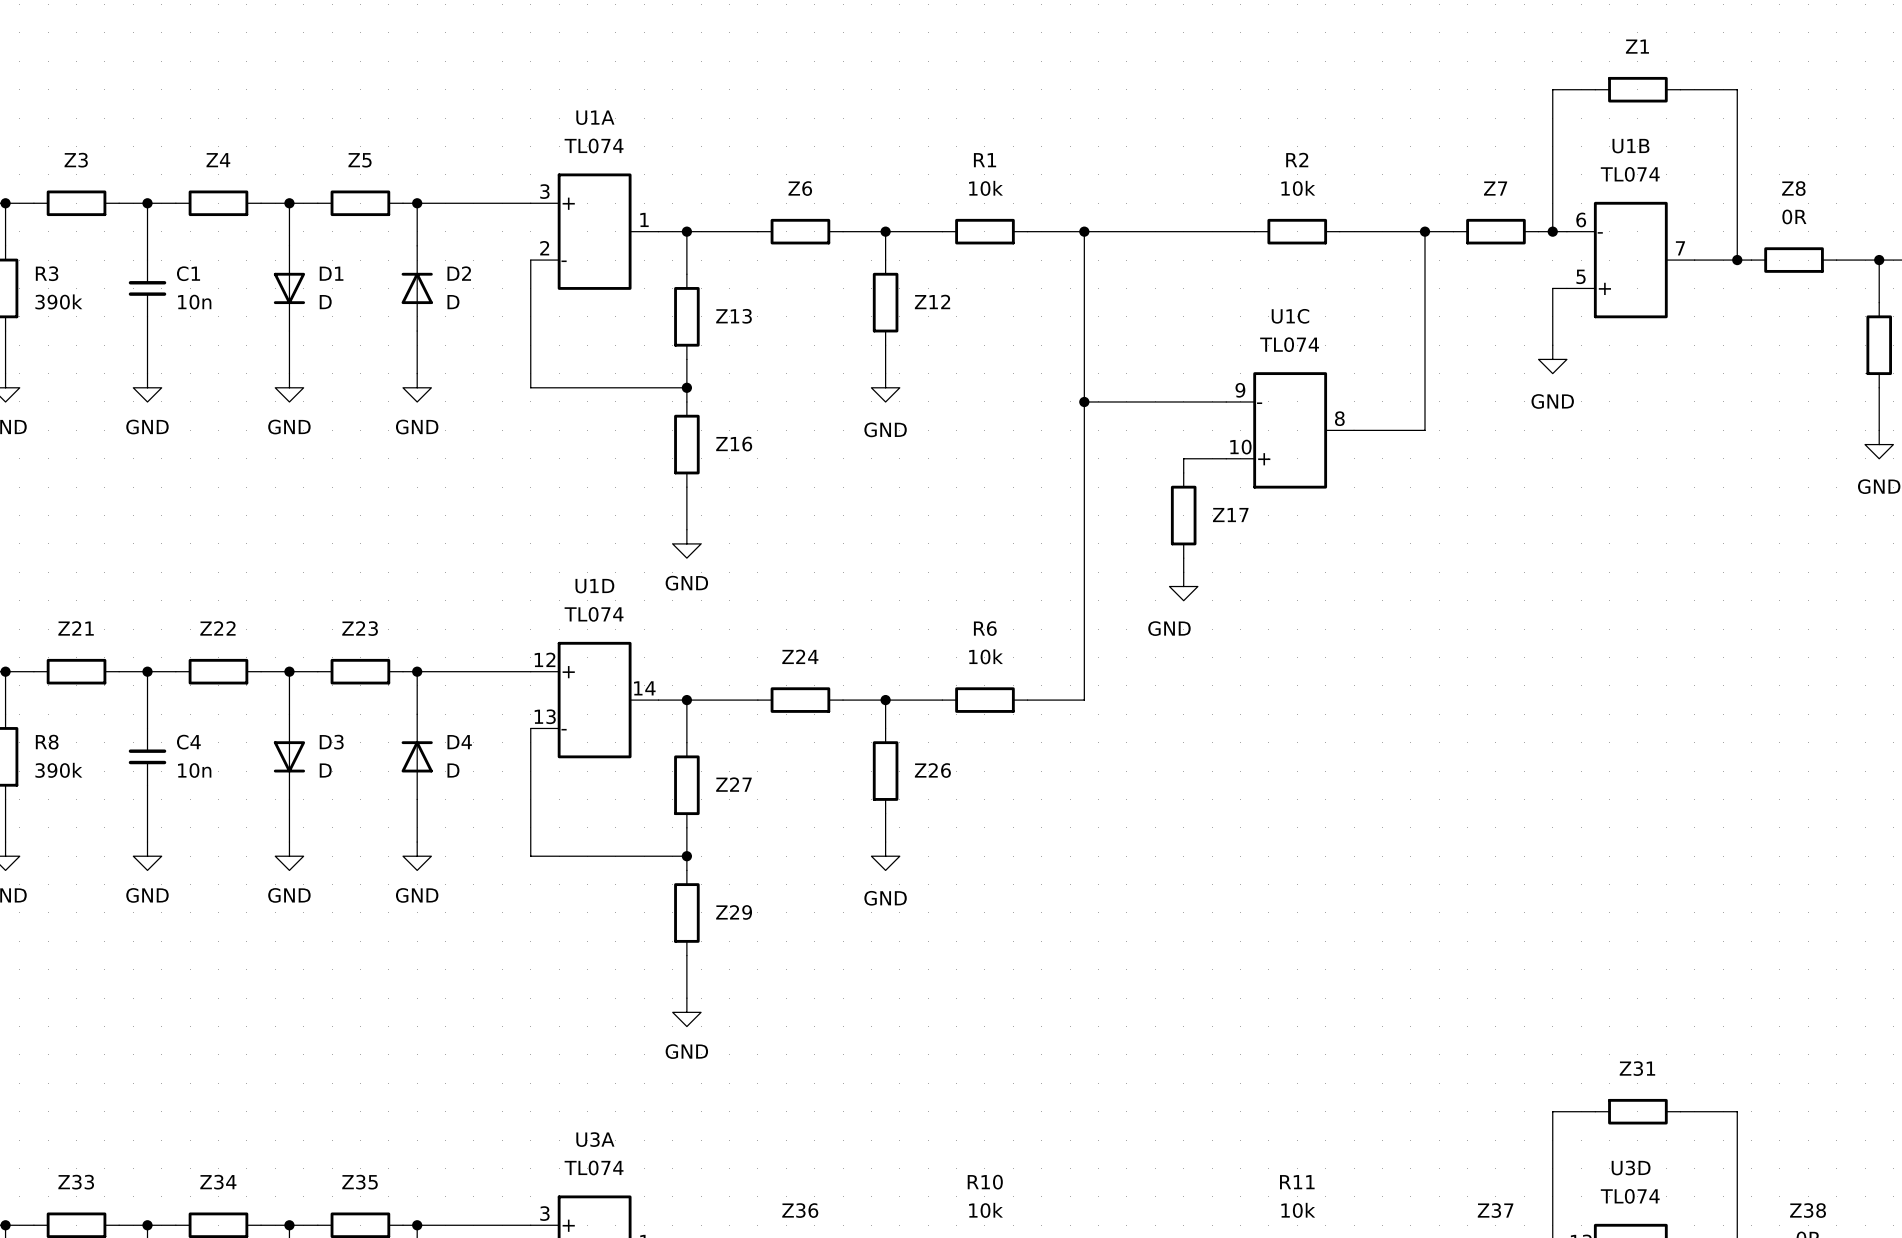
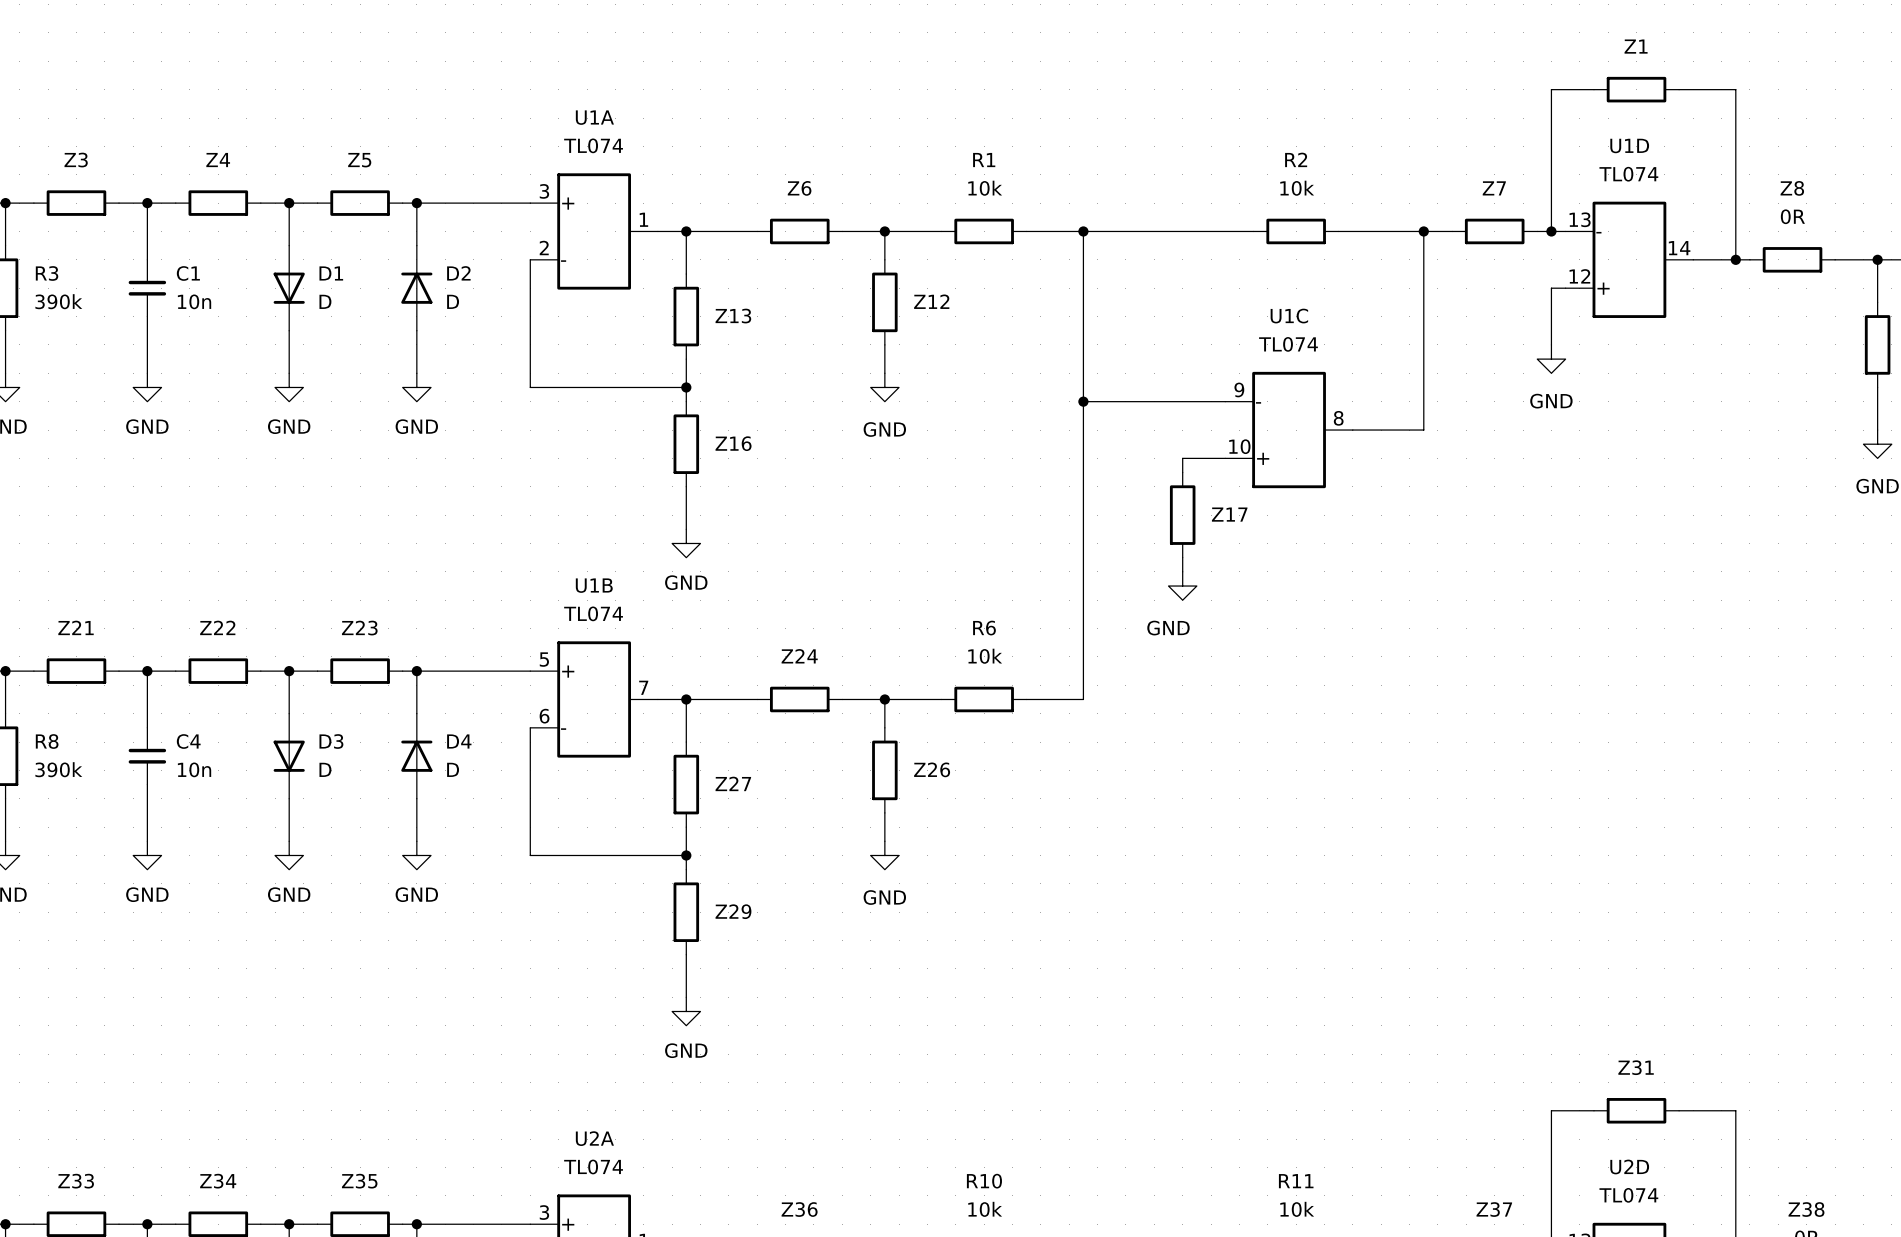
U1B flip: as is (1630, 260) -> up-down (594, 699)
U1B position: (1630, 260) -> (594, 699)
U1D flip: as is (594, 700) -> up-down (1629, 259)
U1D position: (594, 700) -> (1629, 259)
U3A name: U3A (595, 1139) -> U2A (594, 1138)
U3D name: U3D (1631, 1167) -> U2D (1629, 1166)

